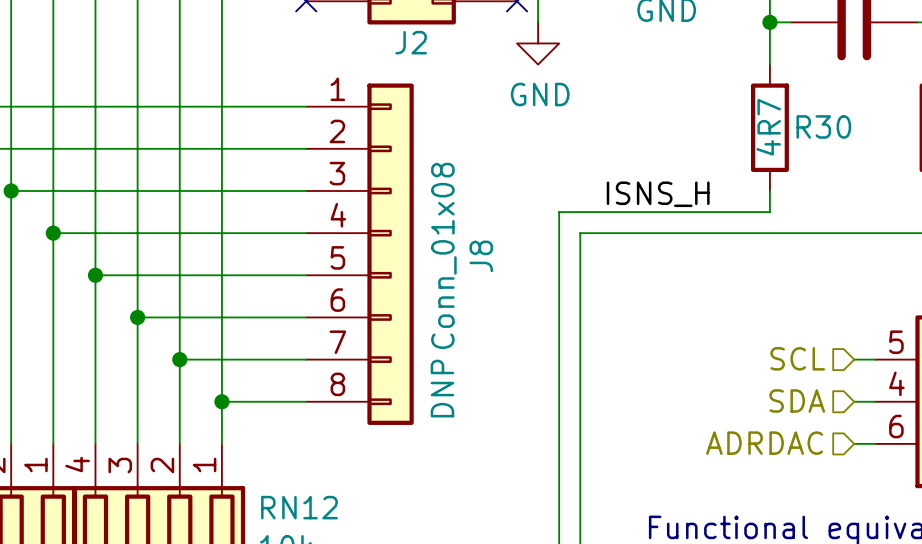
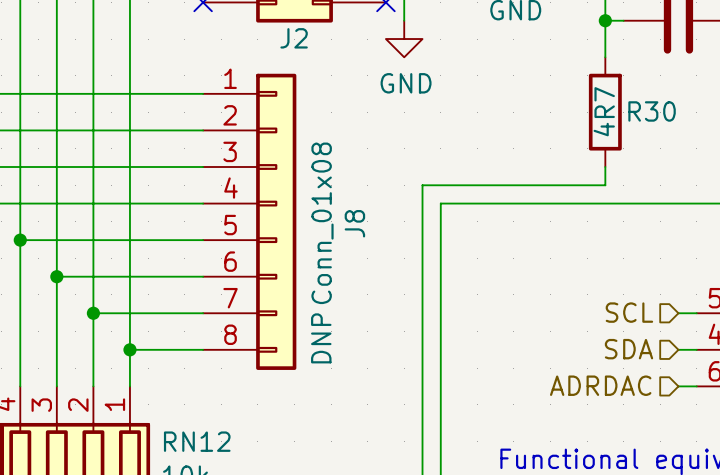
label: ISNS_H (658, 194) -> none

